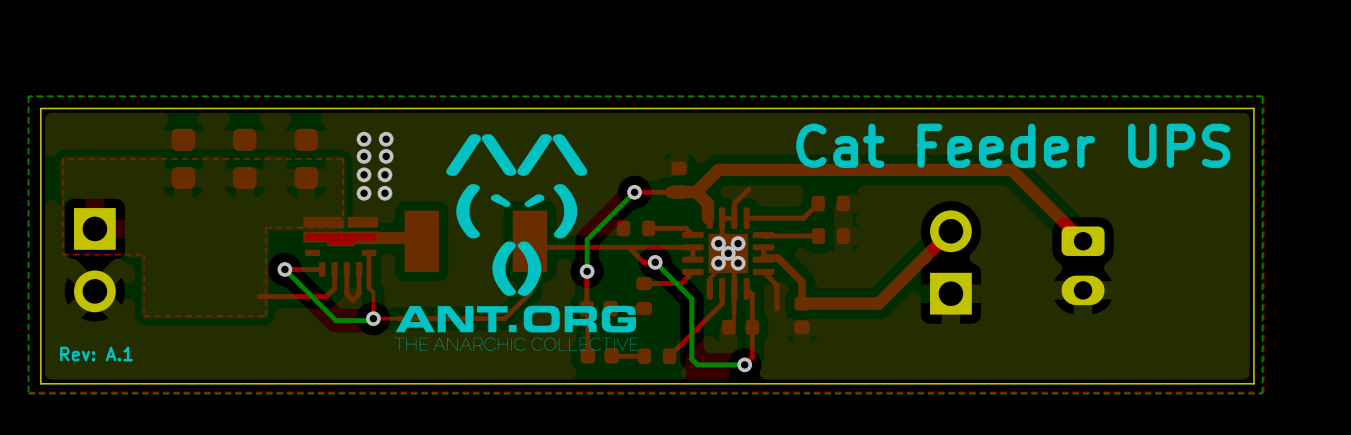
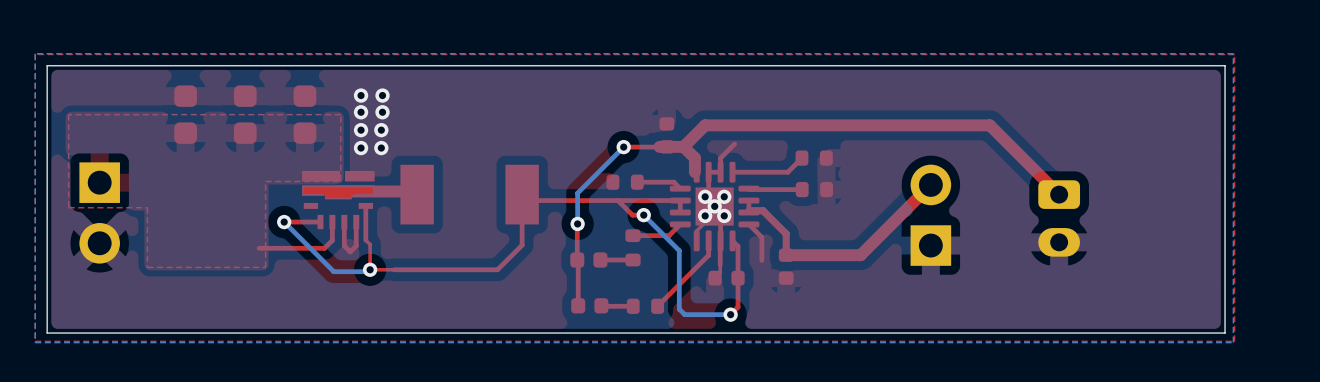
drawing: [394, 134, 639, 351] -> none
text: Cat Feeder UPS (1013, 145) -> none
text: Rev: A.1 (96, 354) -> none

